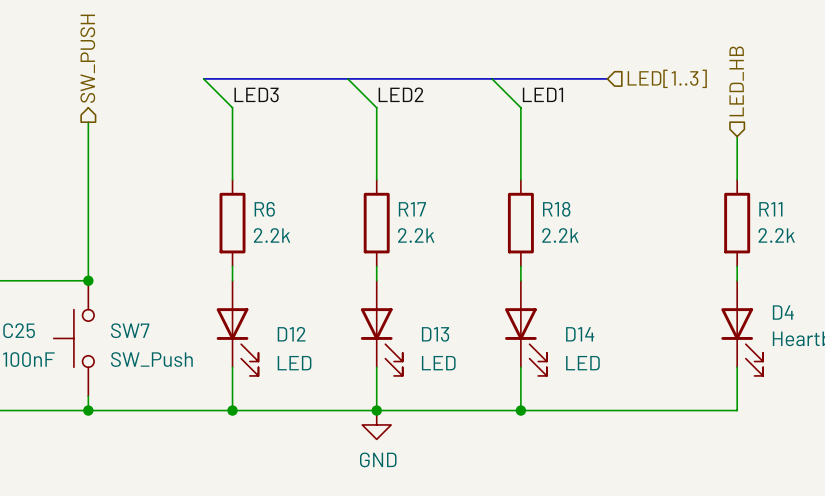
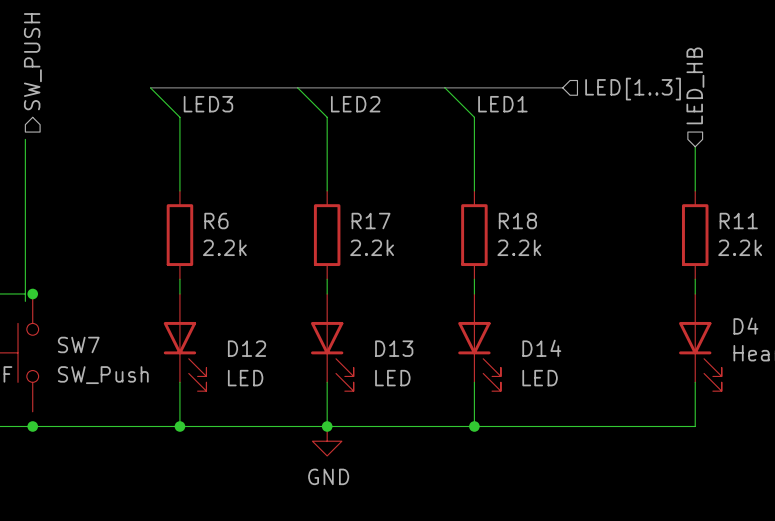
wire: (88, 122) (88, 280) (81, 280) -> none
wire: none -> (25, 139) (25, 301)
wire: (88, 396) (88, 410) -> none

